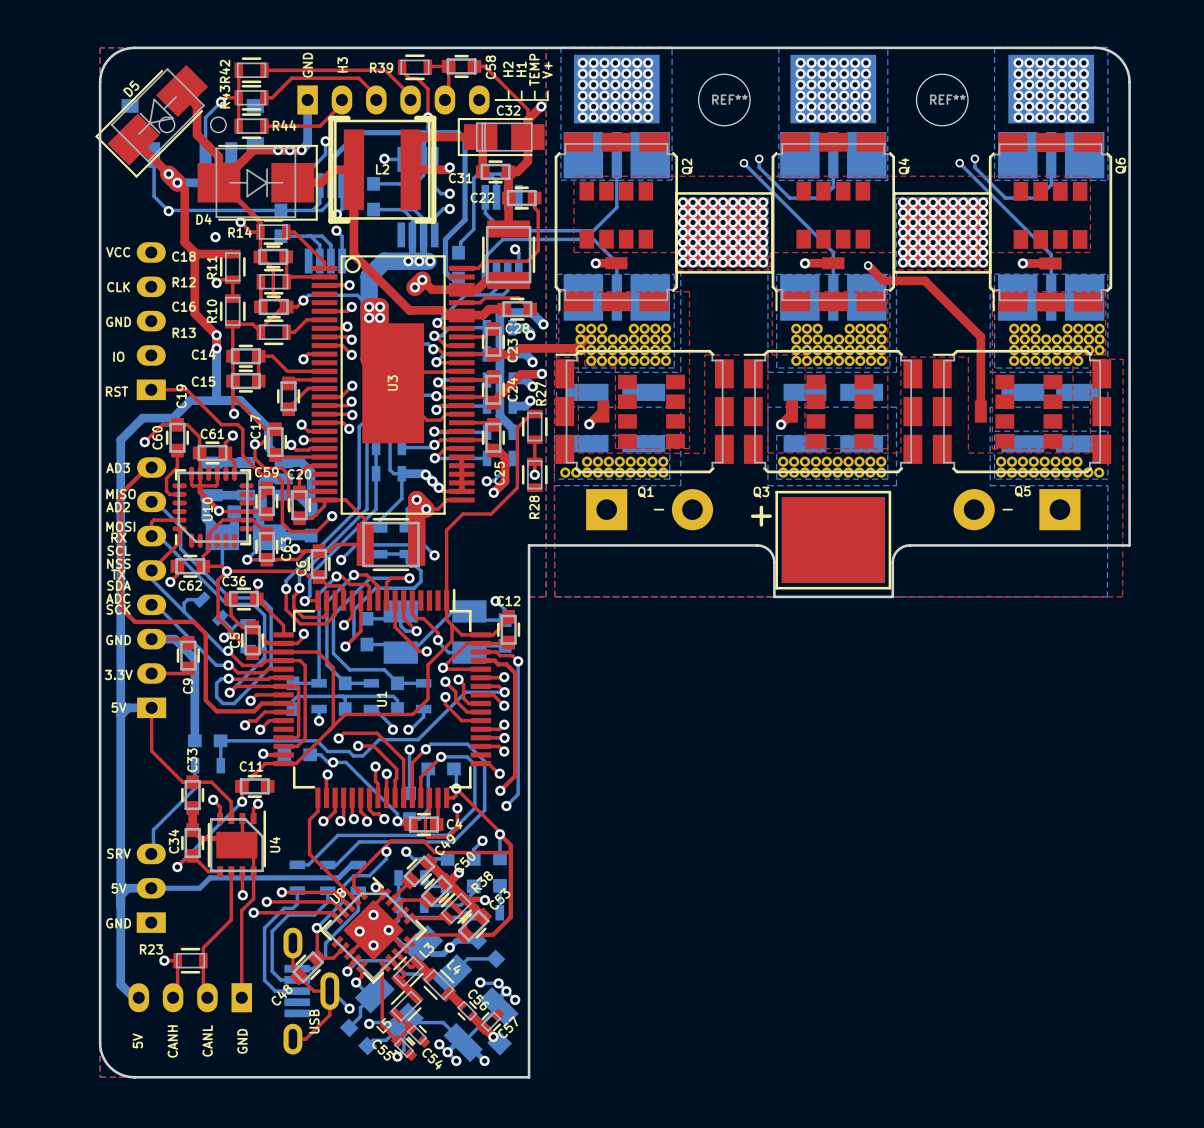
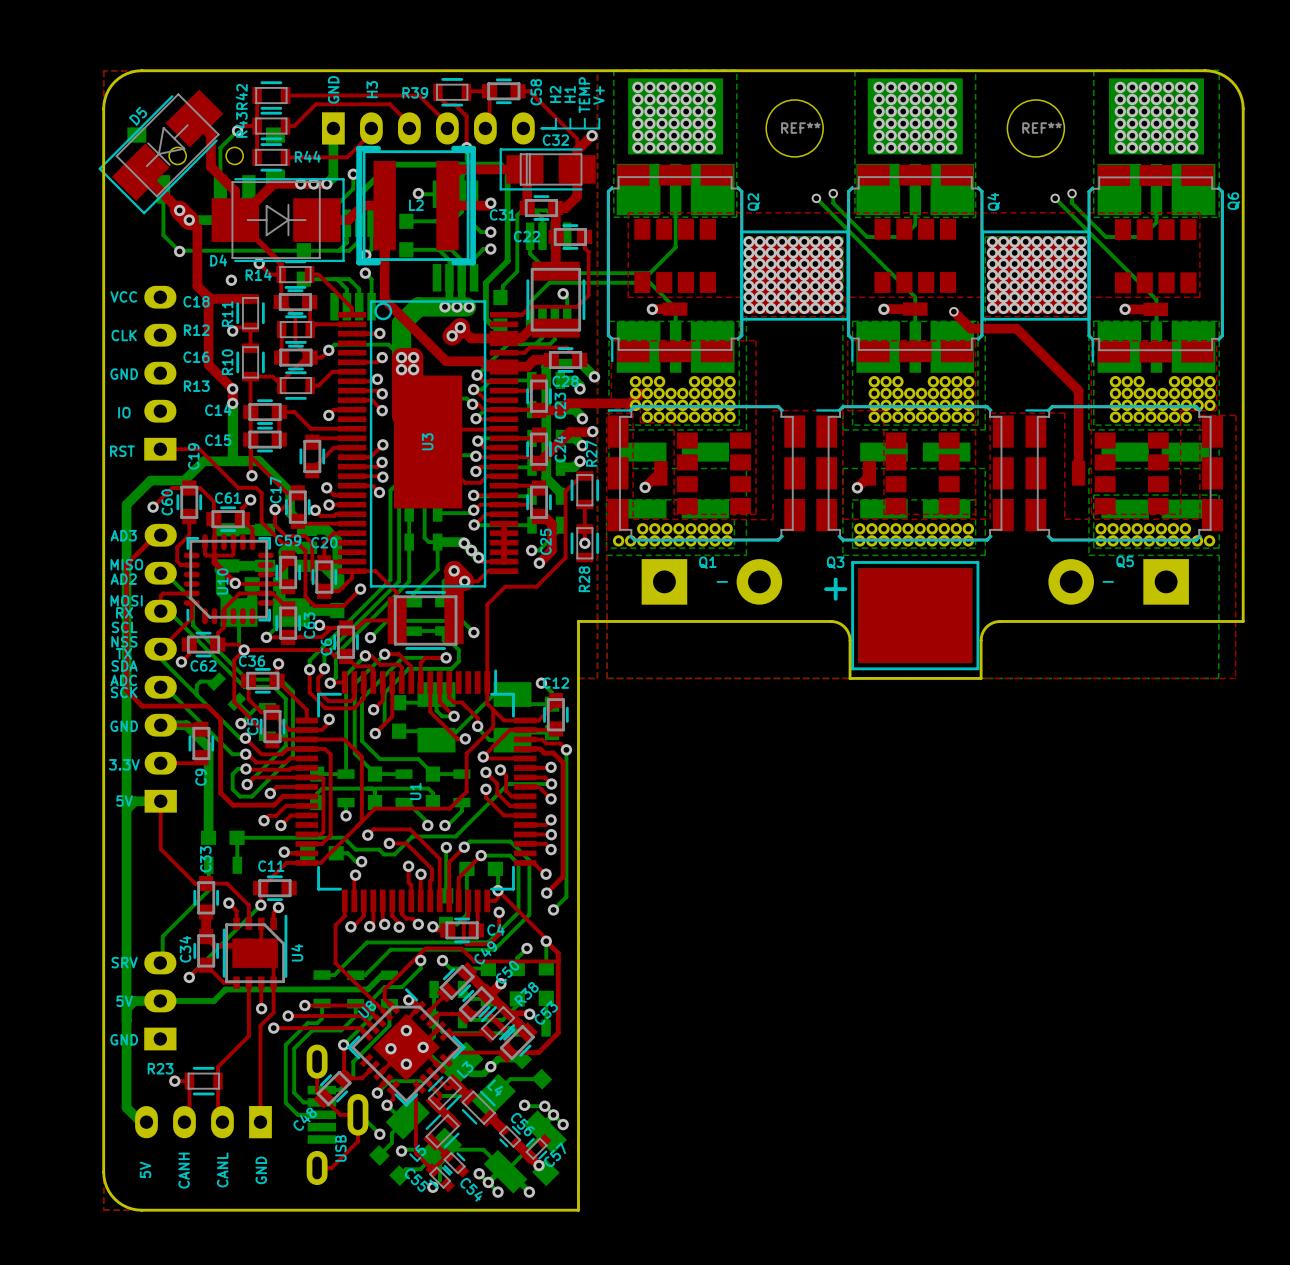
bottom track: (333, 762) (345, 762) (397, 813) (397, 821) -> none

